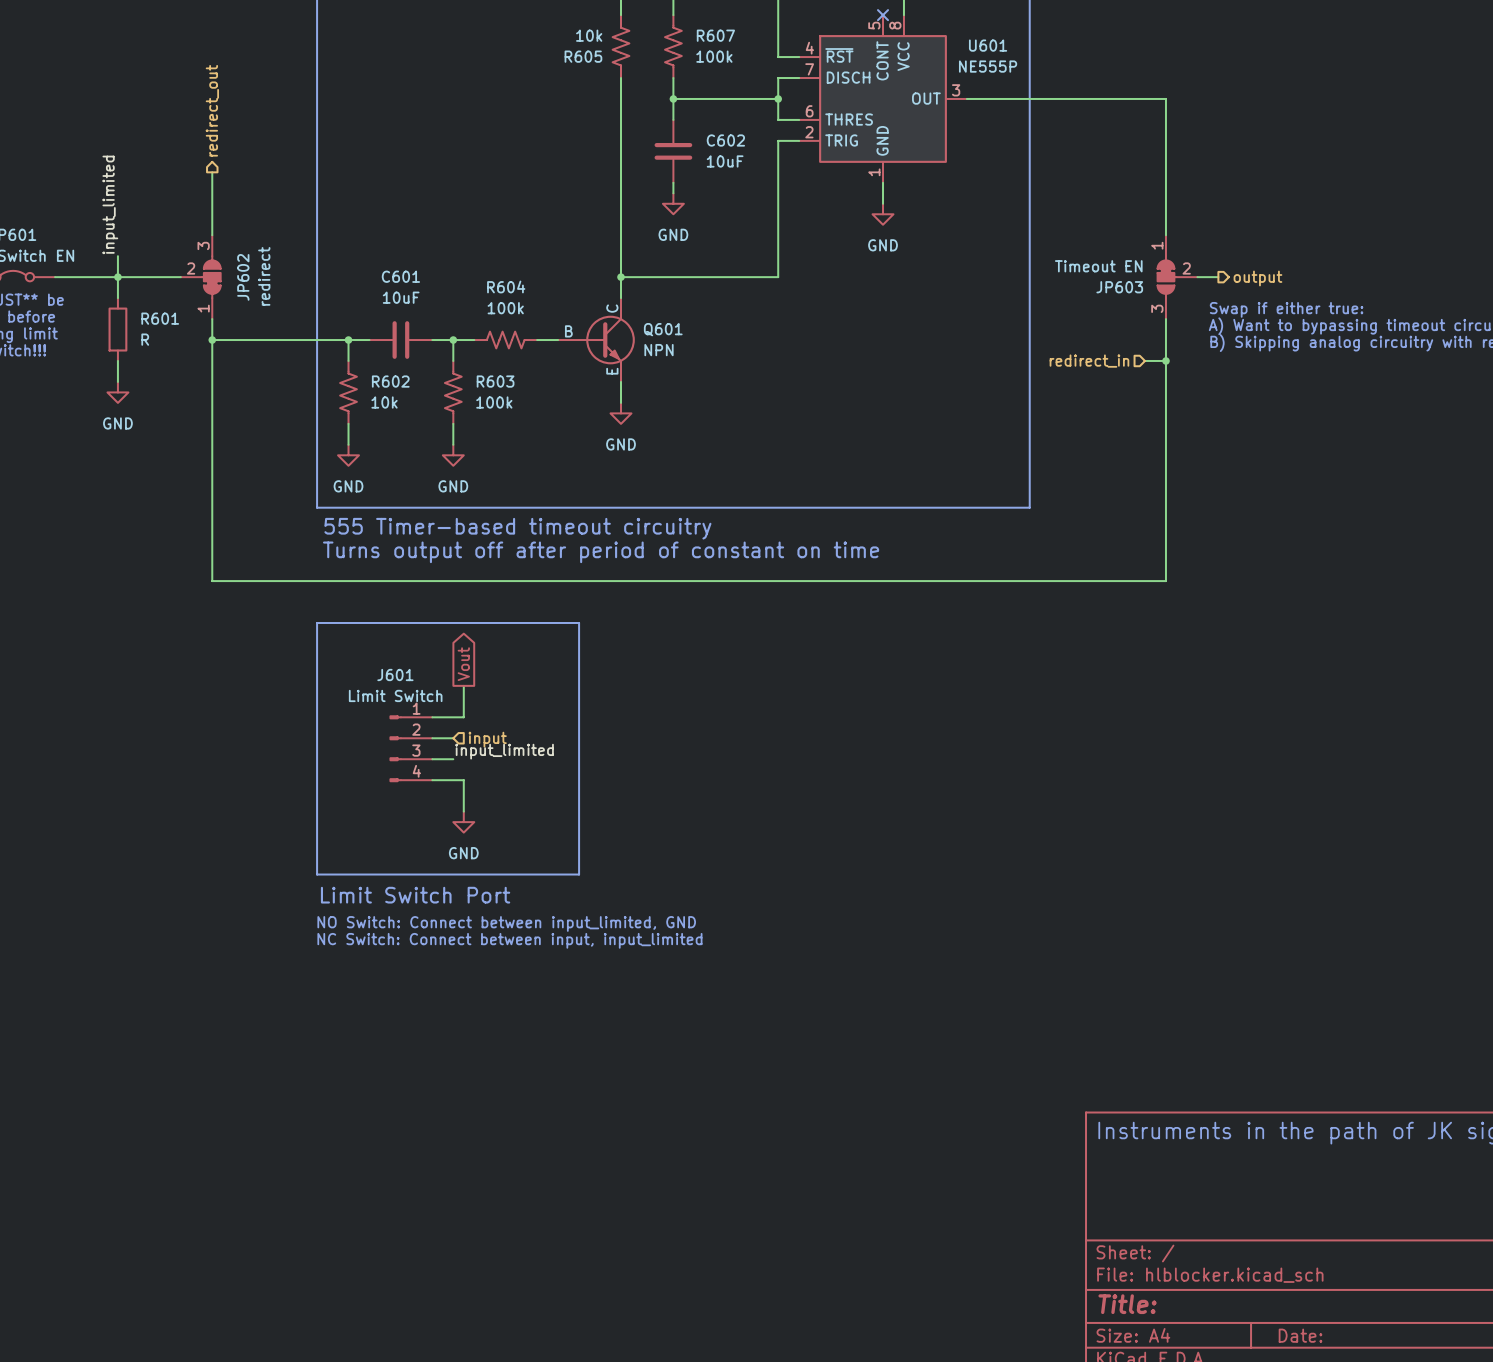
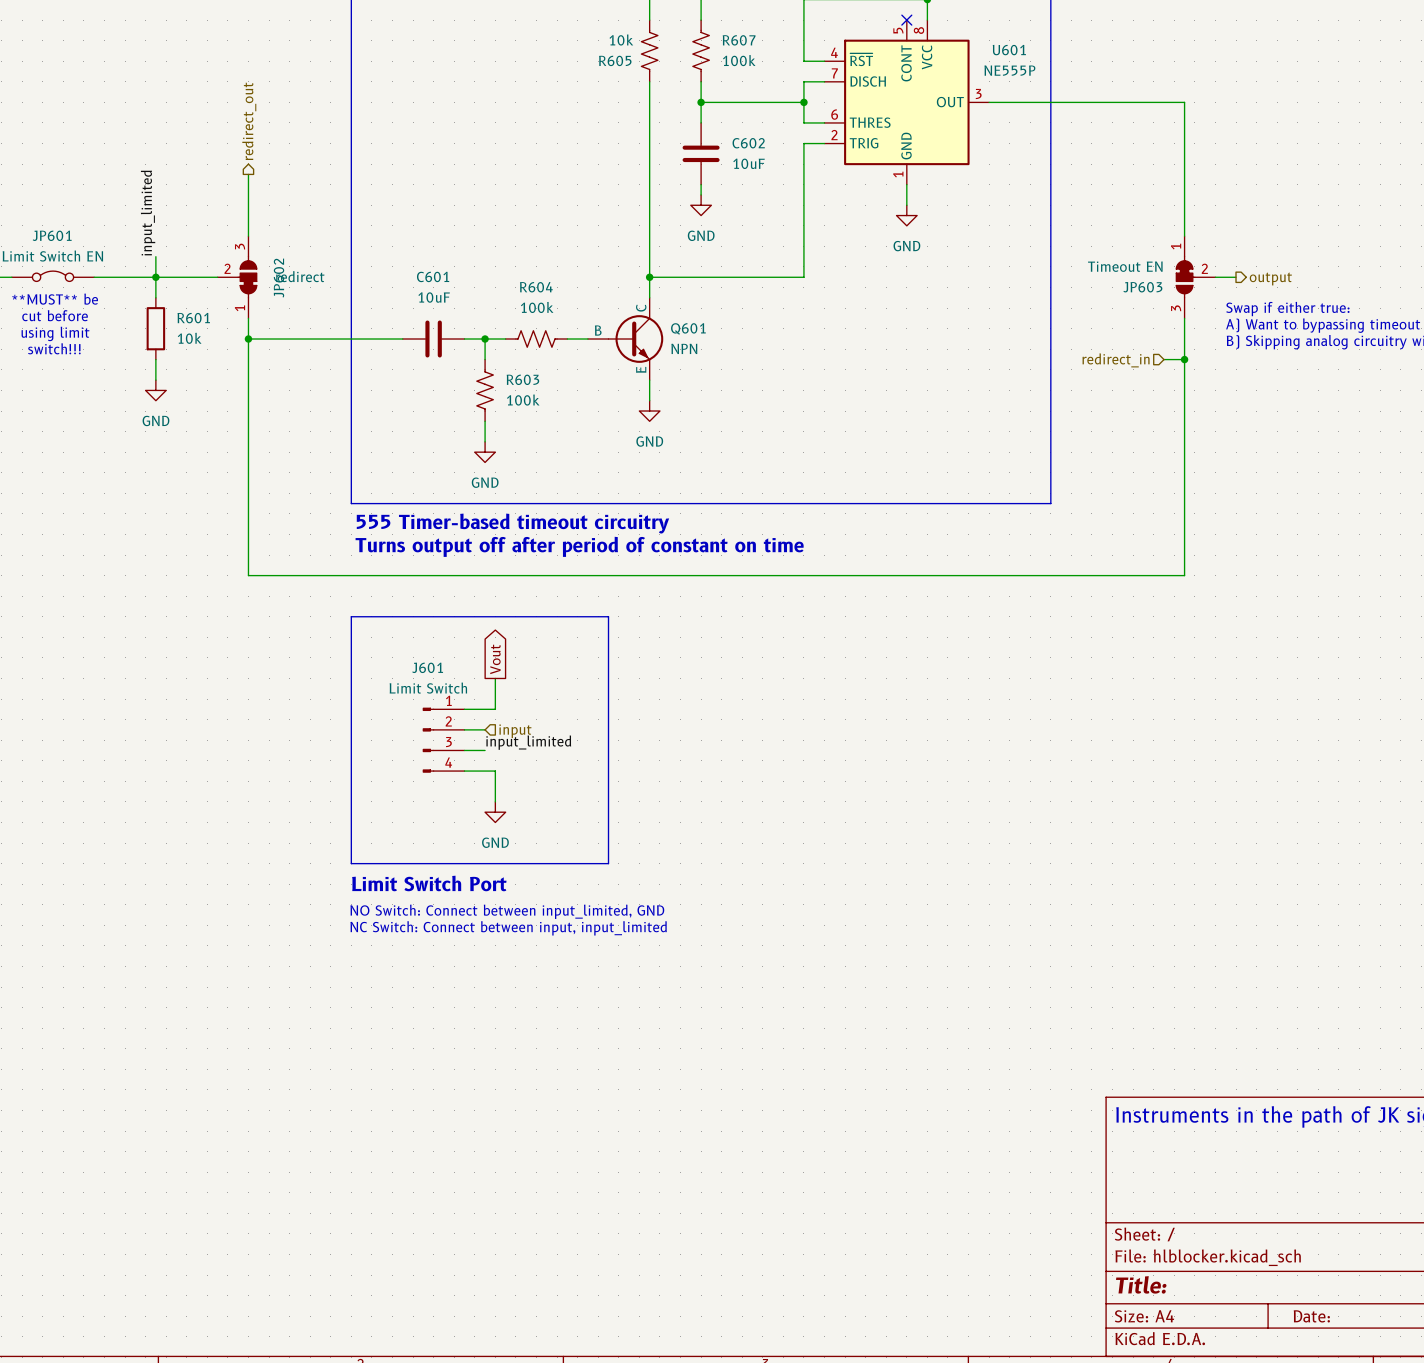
JP602 value rotation: 0° (264, 276) -> 90° clockwise (300, 276)
R601 value: R (145, 339) -> 10k (189, 338)
wire: (348, 340) (348, 360) -> none
junction: (348, 340) -> none
R602: 10k (348, 392) -> none
wire: (348, 423) (348, 444) -> none
power symbol: GND (348, 455) -> none

